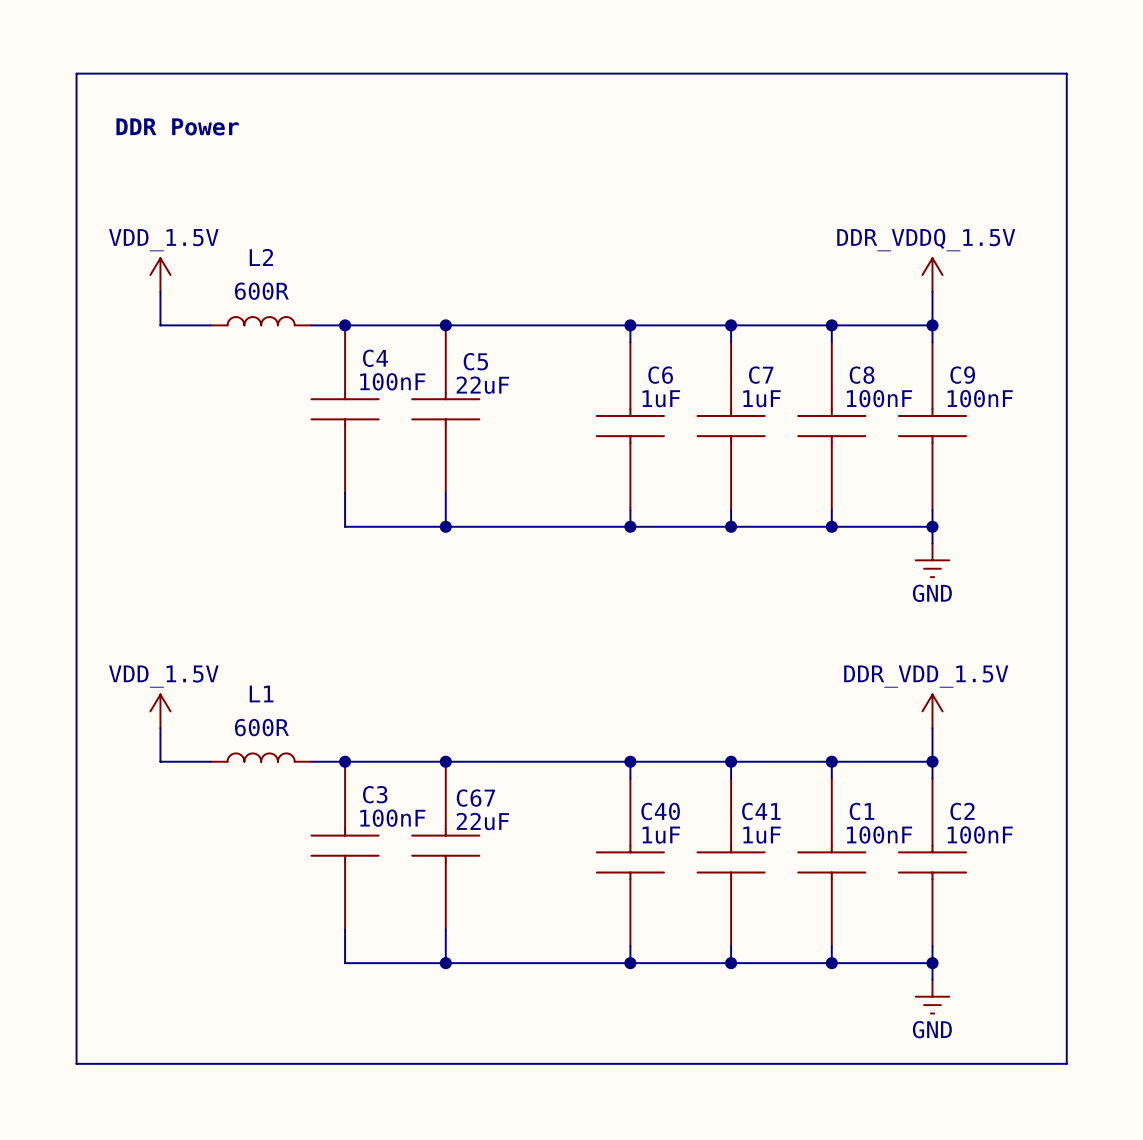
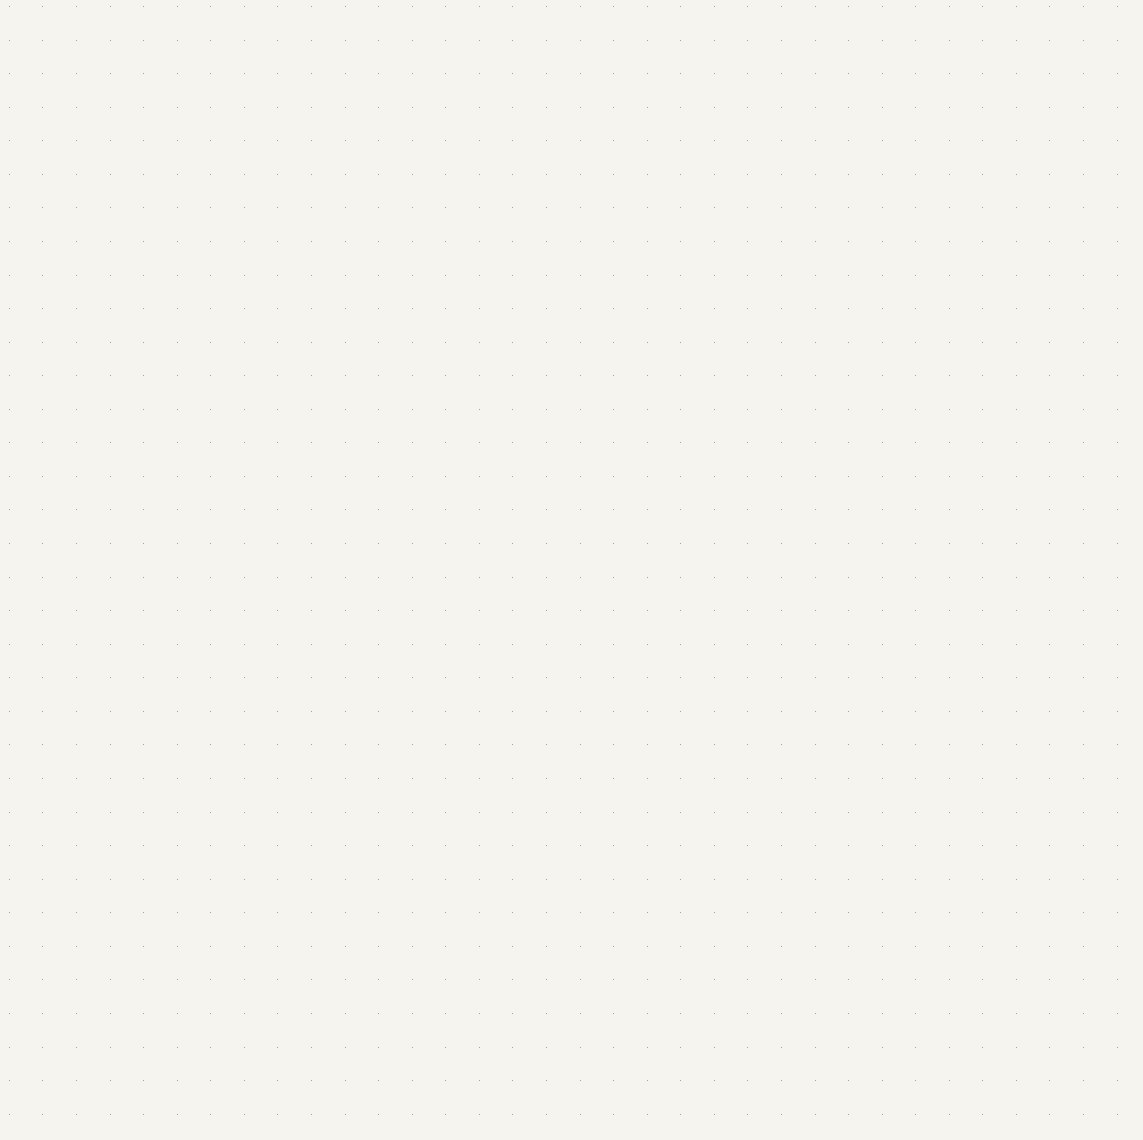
line: (76, 73) (1066, 73) (1066, 1063) (76, 1063) (76, 73) -> none
text: DDR Power (177, 126) -> none
power symbol: VDD_1.5V (160, 275) -> none
power symbol: DDR_VDDQ_1.5V (932, 275) -> none
wire: (160, 291) (160, 325) (210, 325) -> none
wire: (932, 291) (932, 342) -> none
L2: 600R (261, 321) -> none
wire: (311, 325) (932, 325) -> none
junction: (345, 325) -> none
junction: (445, 325) -> none
wire: (630, 325) (630, 342) -> none
junction: (630, 325) -> none
wire: (731, 325) (731, 342) -> none
junction: (731, 325) -> none
wire: (831, 325) (831, 342) -> none
junction: (831, 325) -> none
junction: (932, 325) -> none
C4: 100nF (345, 409) -> none
C5: 22uF (445, 409) -> none
C6: 1uF (630, 426) -> none
C7: 1uF (731, 426) -> none
C8: 100nF (831, 426) -> none
C9: 100nF (932, 426) -> none
wire: (345, 493) (345, 526) (932, 526) -> none
wire: (445, 493) (445, 526) -> none
wire: (630, 509) (630, 526) -> none
wire: (731, 509) (731, 526) -> none
wire: (831, 509) (831, 526) -> none
wire: (932, 509) (932, 543) -> none
junction: (445, 526) -> none
junction: (630, 526) -> none
junction: (731, 526) -> none
junction: (831, 526) -> none
junction: (932, 526) -> none
power symbol: GND (932, 560) -> none
power symbol: VDD_1.5V (160, 711) -> none
power symbol: DDR_VDD_1.5V (932, 711) -> none
wire: (160, 728) (160, 761) (210, 761) -> none
wire: (932, 728) (932, 778) -> none
L1: 600R (261, 757) -> none
wire: (311, 761) (932, 761) -> none
junction: (345, 761) -> none
junction: (445, 761) -> none
wire: (630, 761) (630, 778) -> none
junction: (630, 761) -> none
wire: (731, 761) (731, 778) -> none
junction: (731, 761) -> none
wire: (831, 761) (831, 778) -> none
junction: (831, 761) -> none
junction: (932, 761) -> none
C3: 100nF (345, 845) -> none
C67: 22uF (445, 845) -> none
C40: 1uF (630, 862) -> none
C41: 1uF (731, 862) -> none
C1: 100nF (831, 862) -> none
C2: 100nF (932, 862) -> none
wire: (345, 929) (345, 963) (932, 963) -> none
wire: (445, 929) (445, 963) -> none
wire: (630, 946) (630, 963) -> none
wire: (731, 946) (731, 963) -> none
wire: (831, 946) (831, 963) -> none
wire: (932, 946) (932, 979) -> none
junction: (445, 963) -> none
junction: (630, 963) -> none
junction: (731, 963) -> none
junction: (831, 963) -> none
junction: (932, 963) -> none
power symbol: GND (932, 996) -> none

